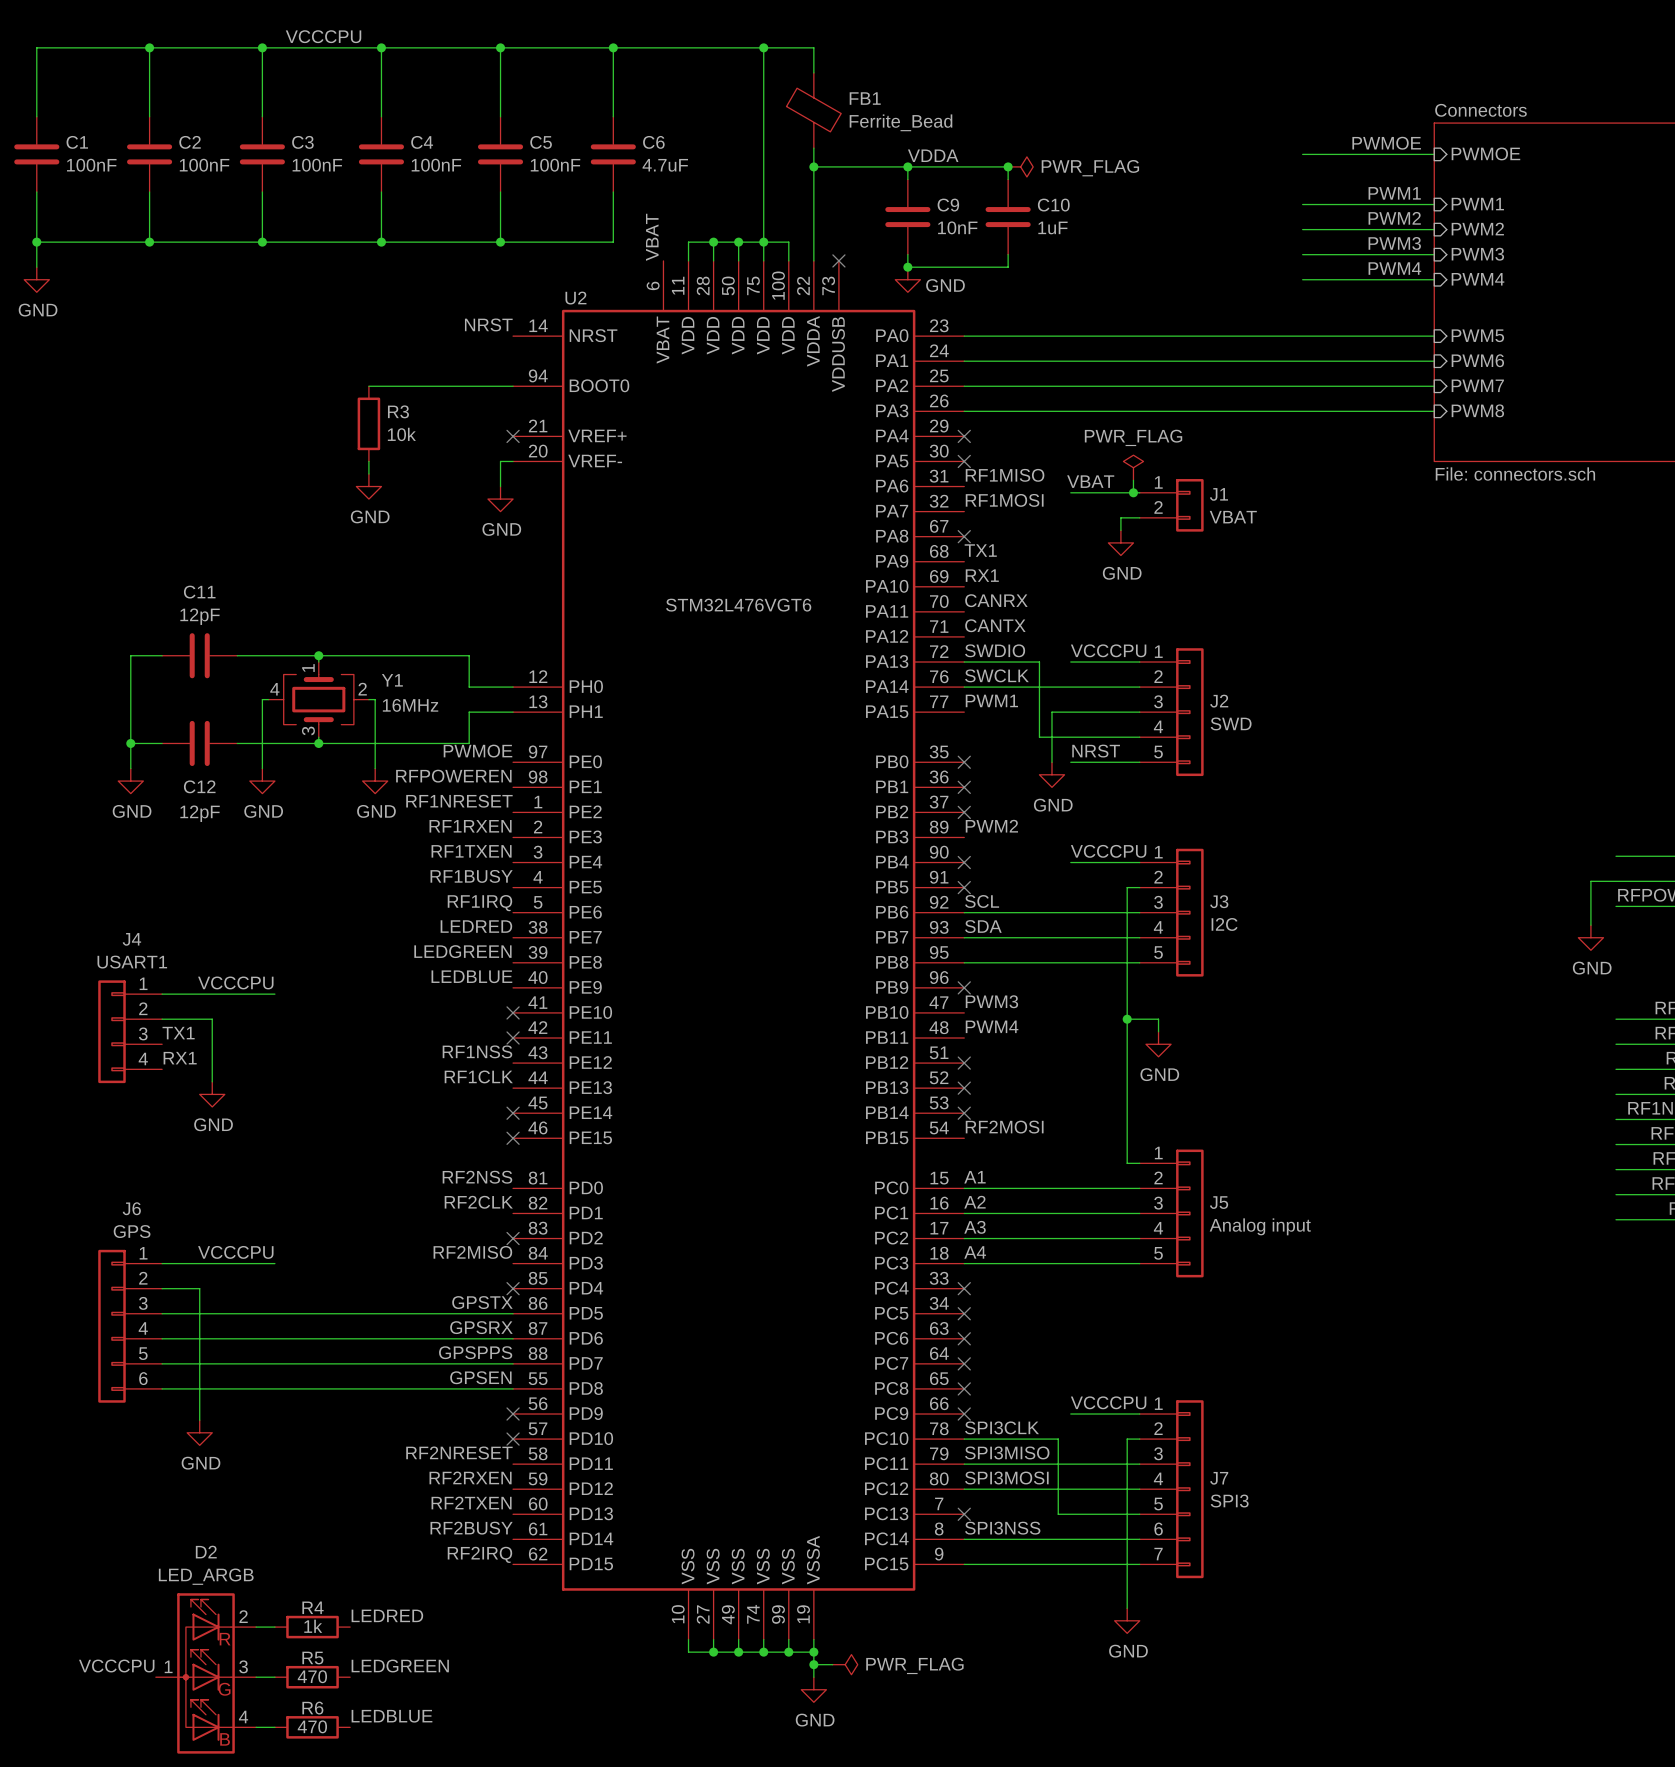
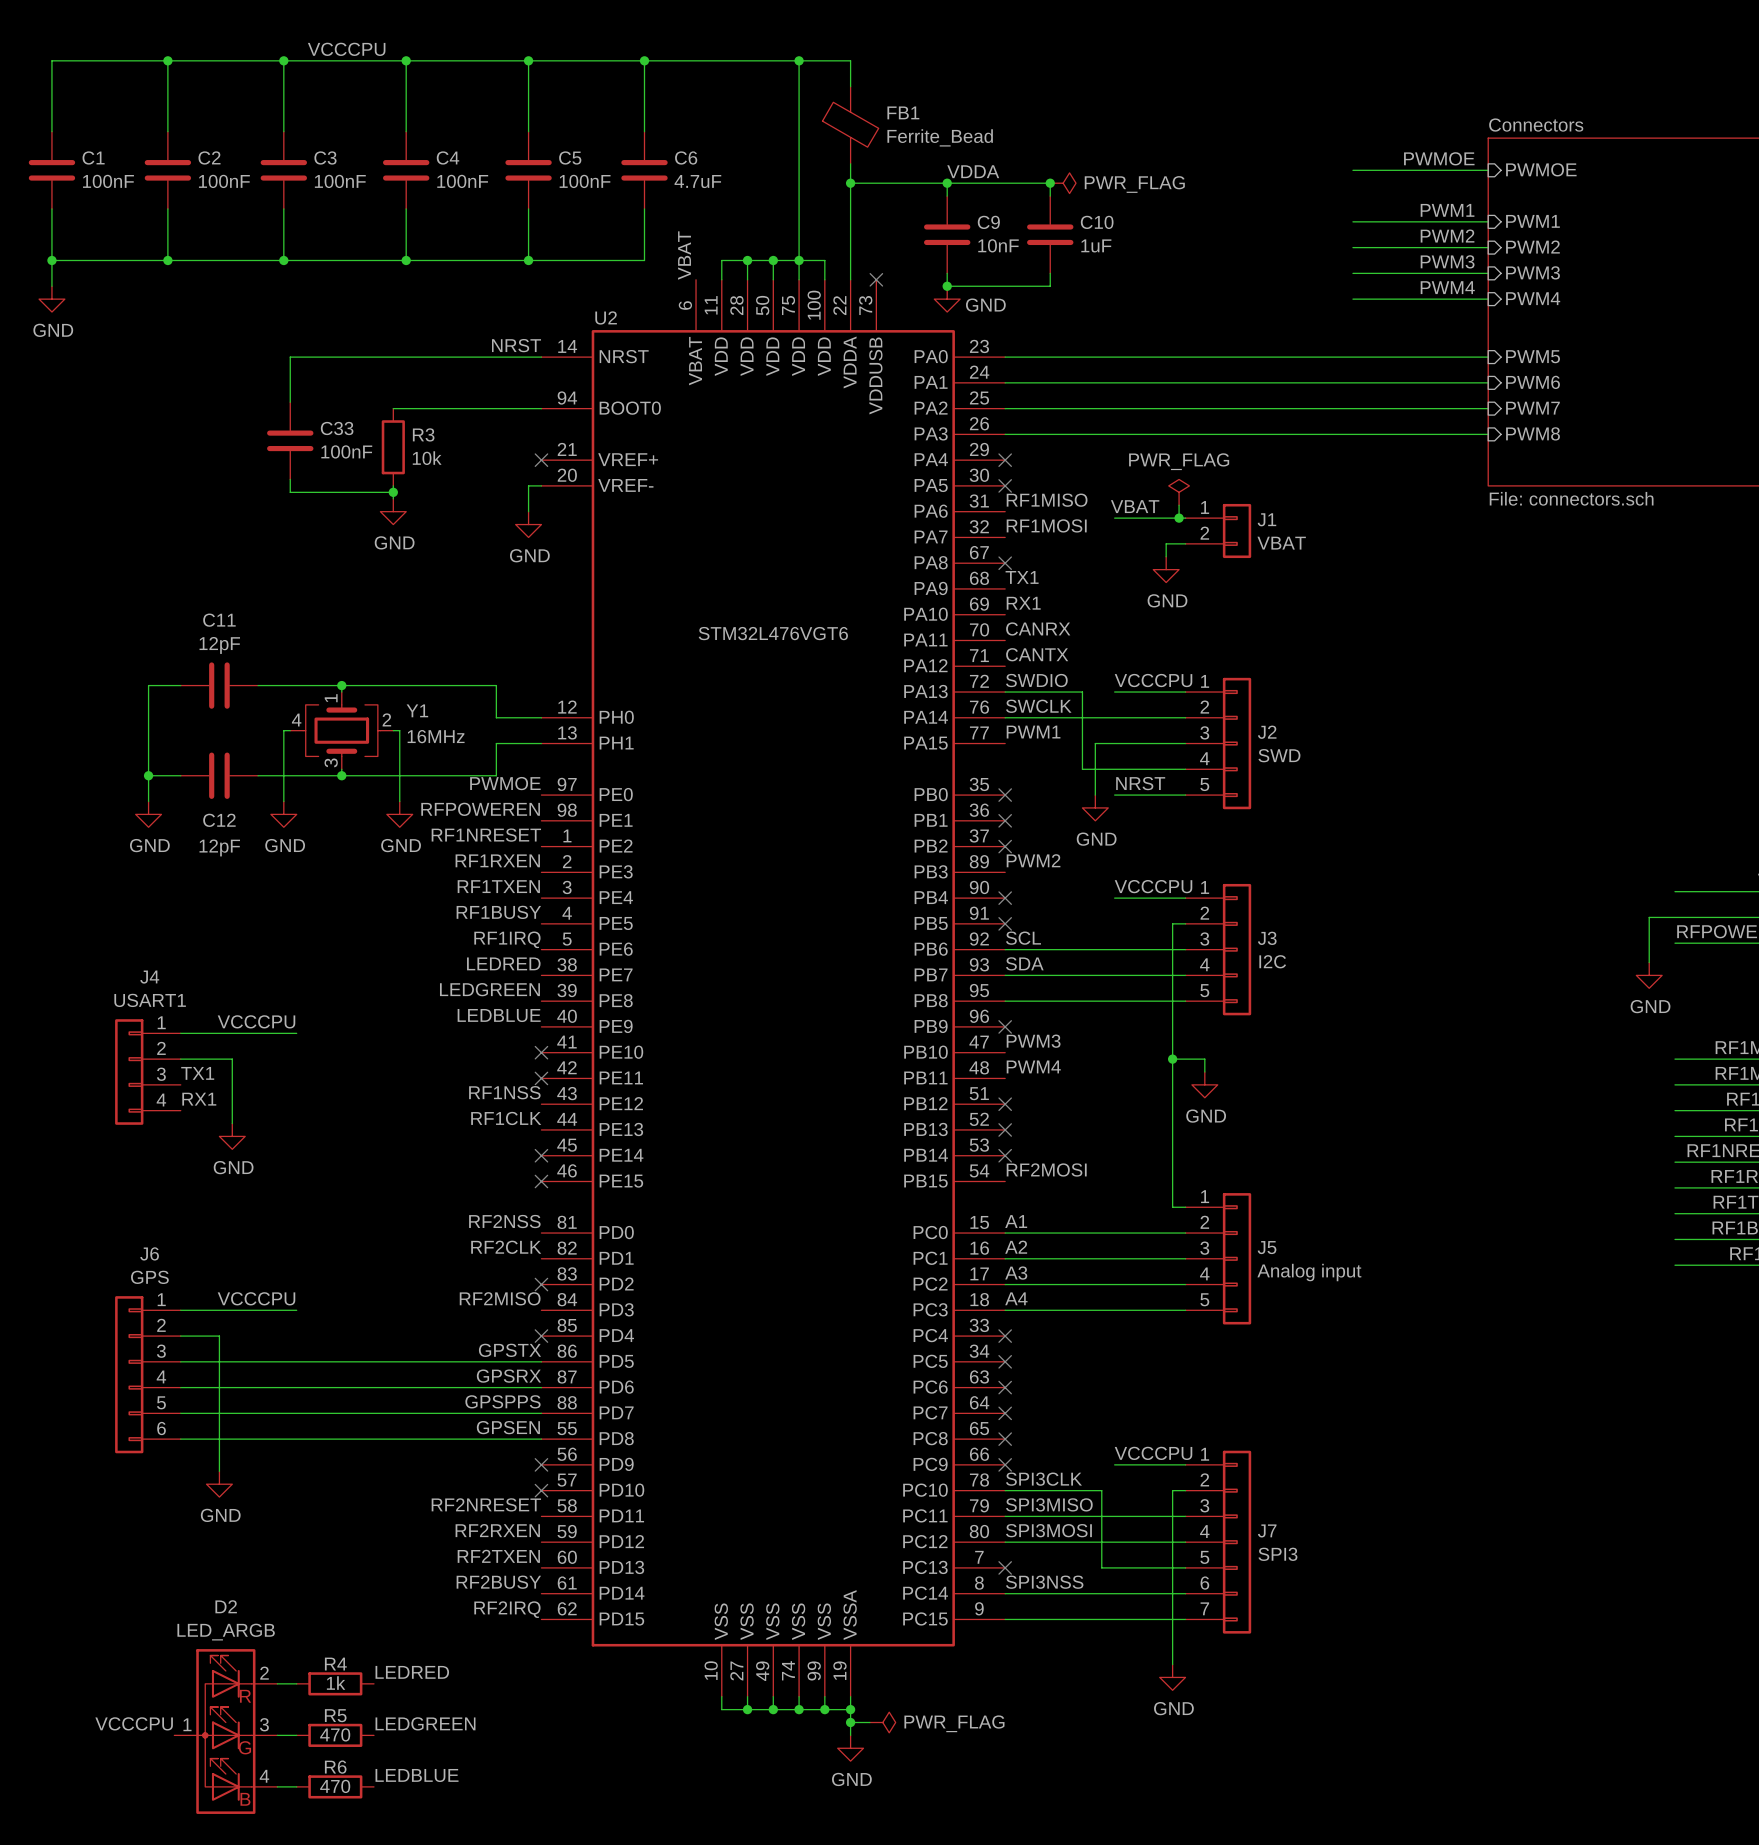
wire: none -> (541, 357) (290, 357) (290, 402)
C33: none -> 100nF (290, 440)
wire: none -> (290, 479) (290, 492) (393, 492)
junction: none -> (393, 492)

